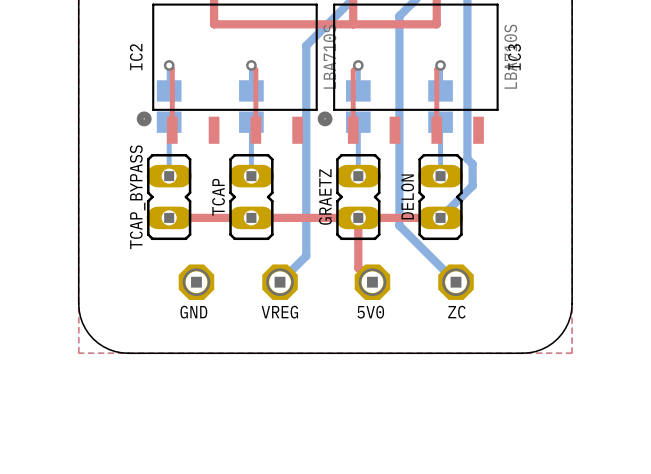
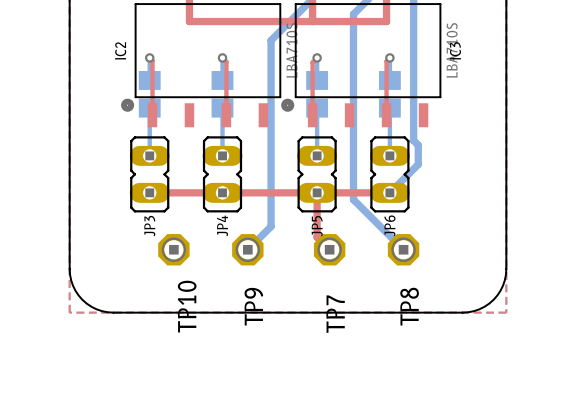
GRAETZ name: GRAETZ (325, 196) -> JP5 (317, 226)
DELON name: DELON (407, 196) -> JP6 (389, 225)
TCAP_BYPASS name: TCAP_BYPASS (137, 197) -> JP3 (149, 226)
TCAP name: TCAP (218, 197) -> JP4 (222, 225)
GND name: GND (193, 312) -> TP10 (187, 306)
VREG name: VREG (279, 312) -> TP9 (253, 306)
5V0 name: 5V0 (370, 312) -> TP7 (335, 314)
ZC name: ZC (456, 312) -> TP8 (409, 306)

